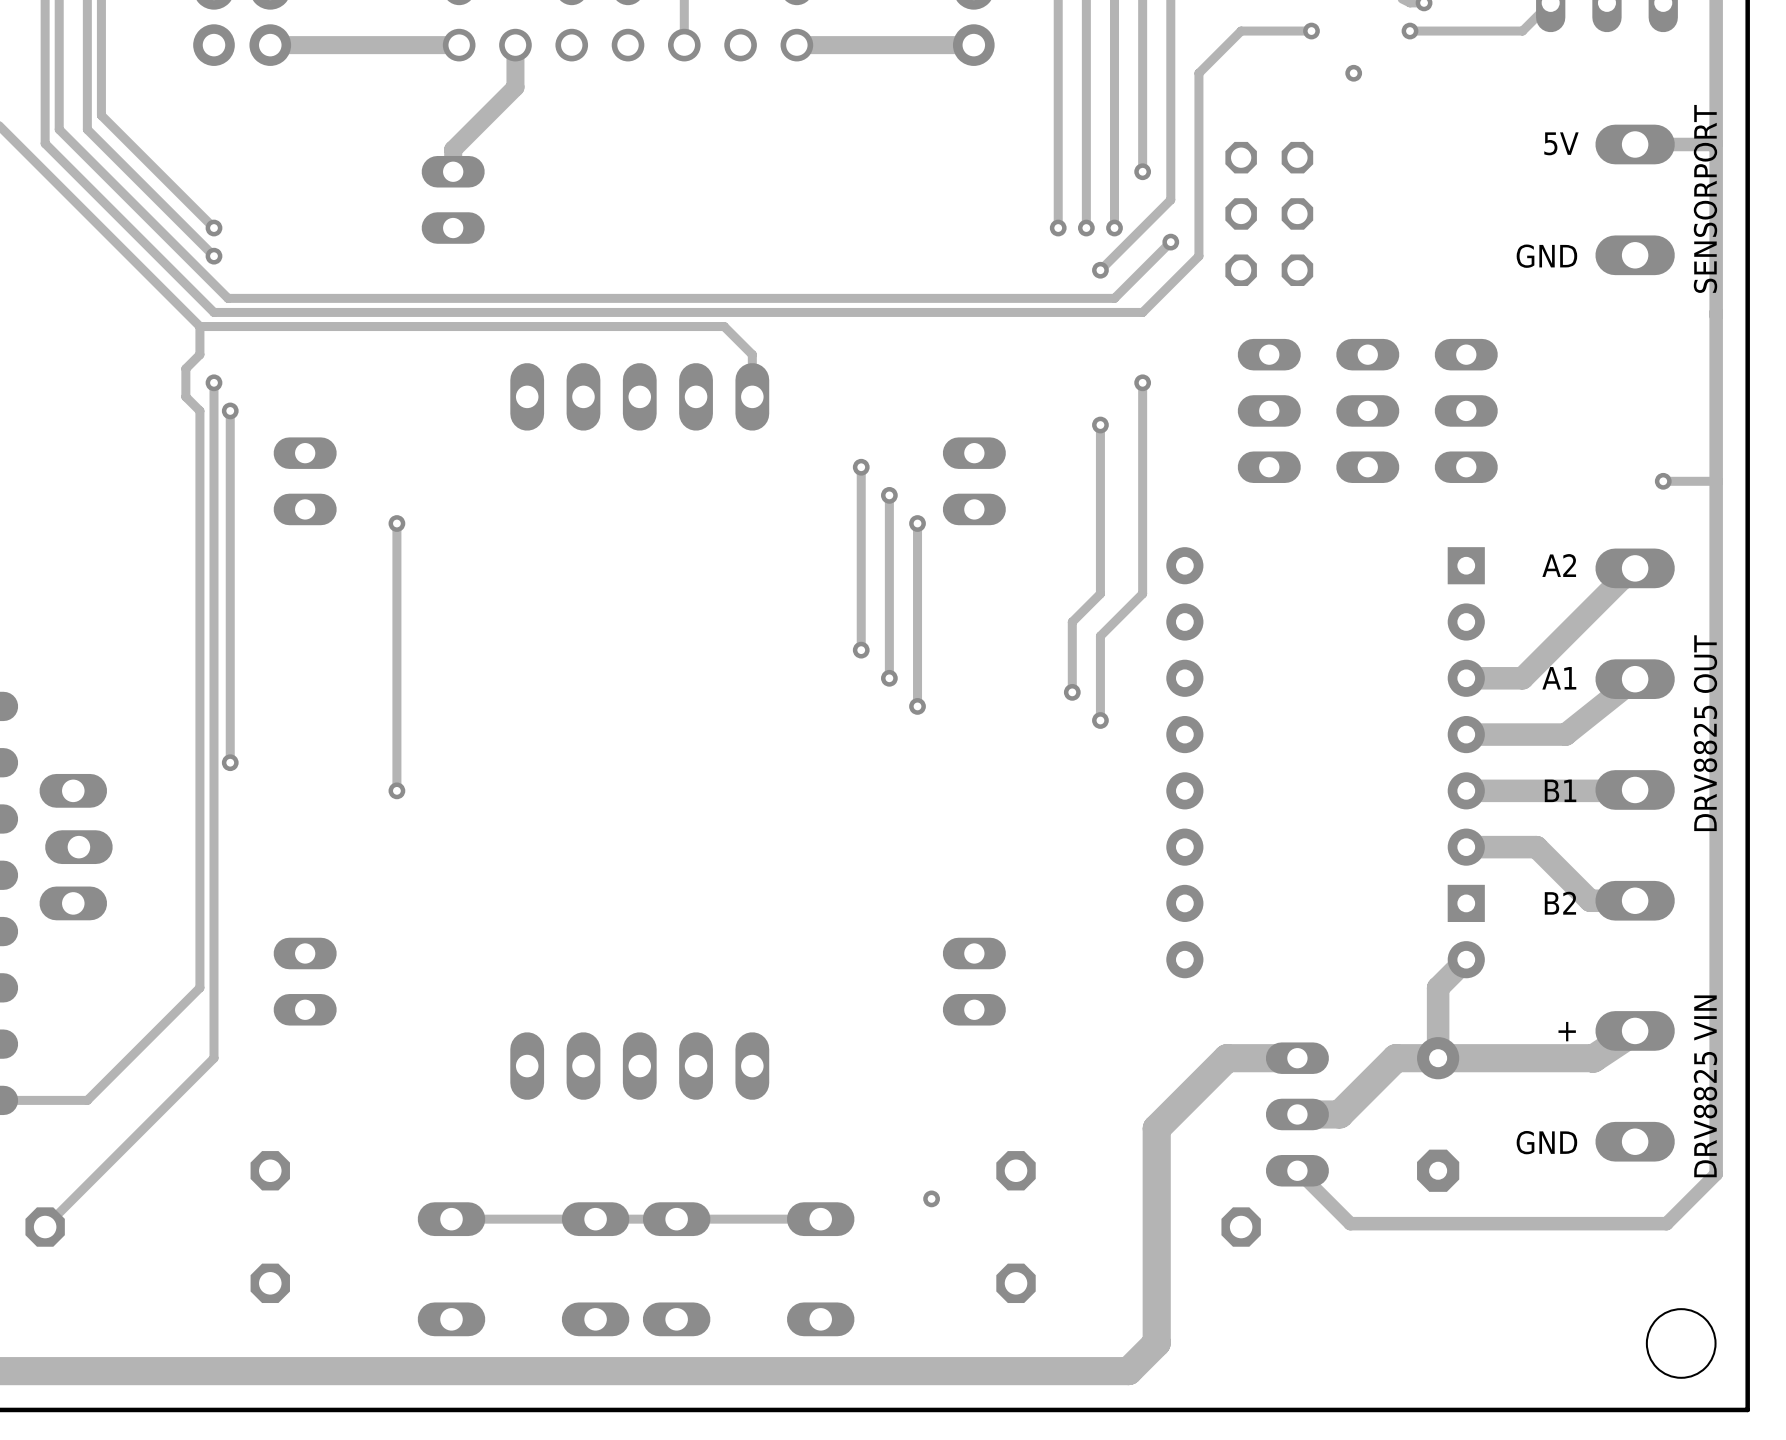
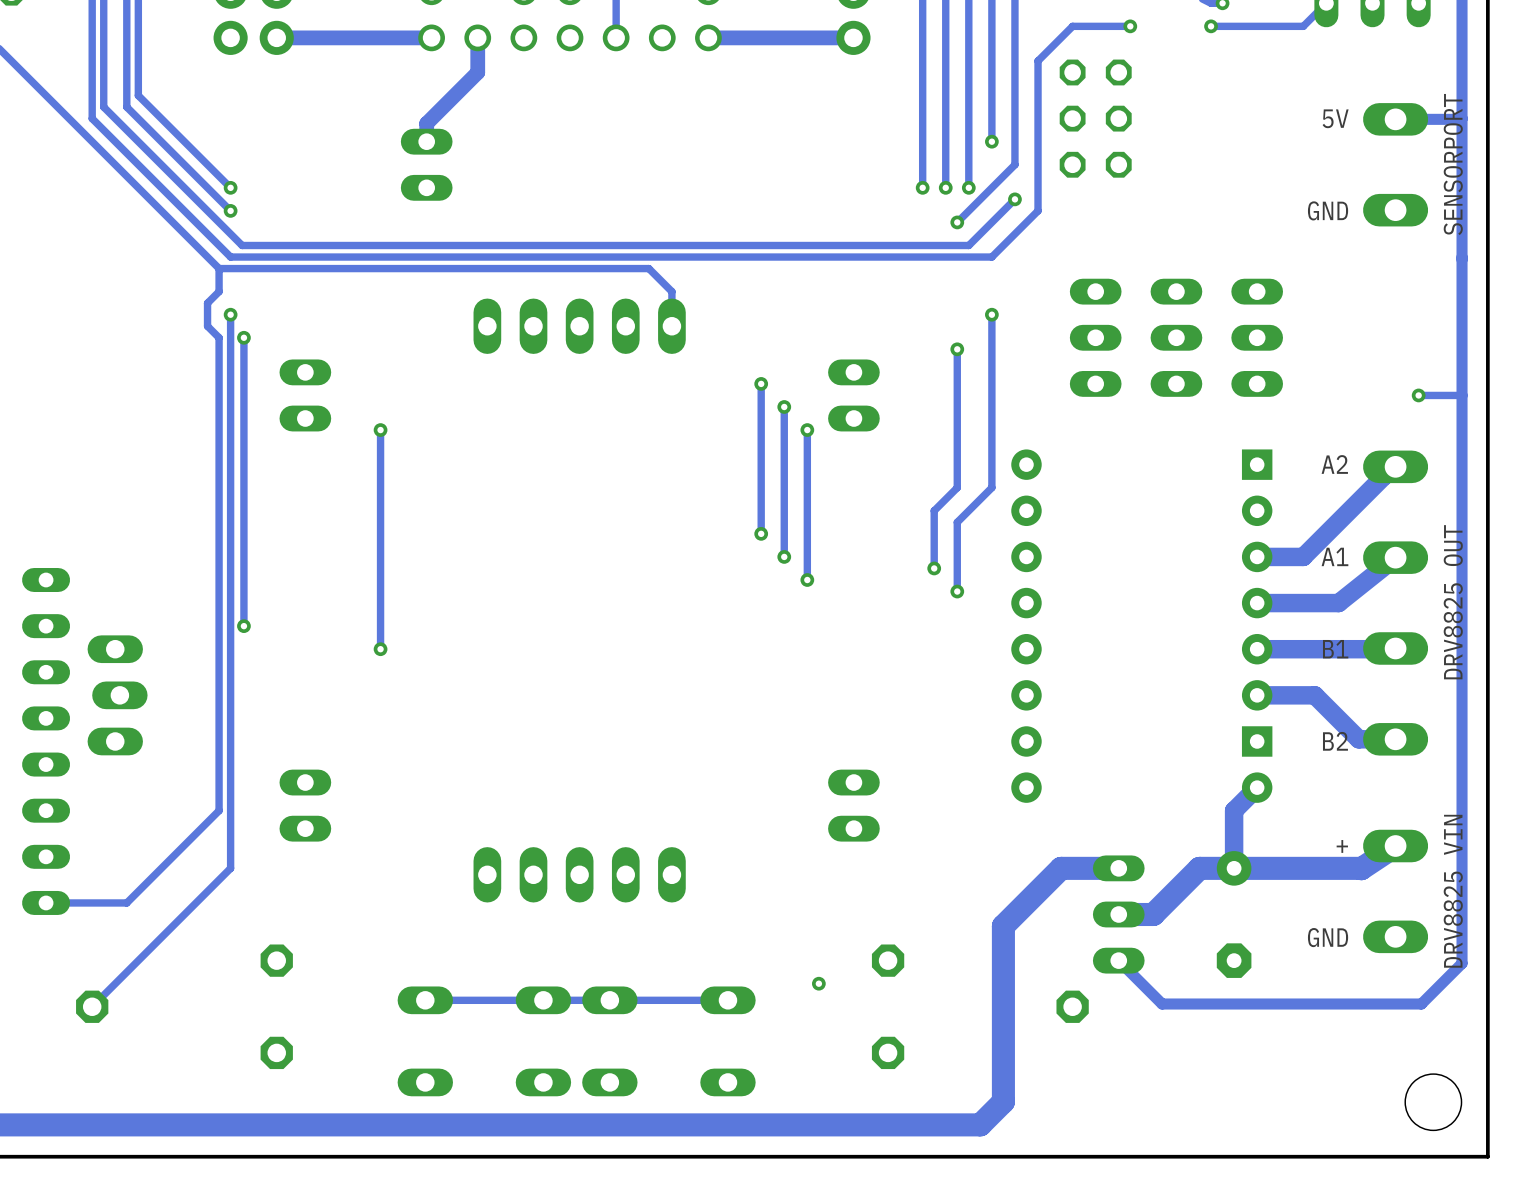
via: (1353, 73) -> none
part position: (1269, 213) -> (1095, 118)

